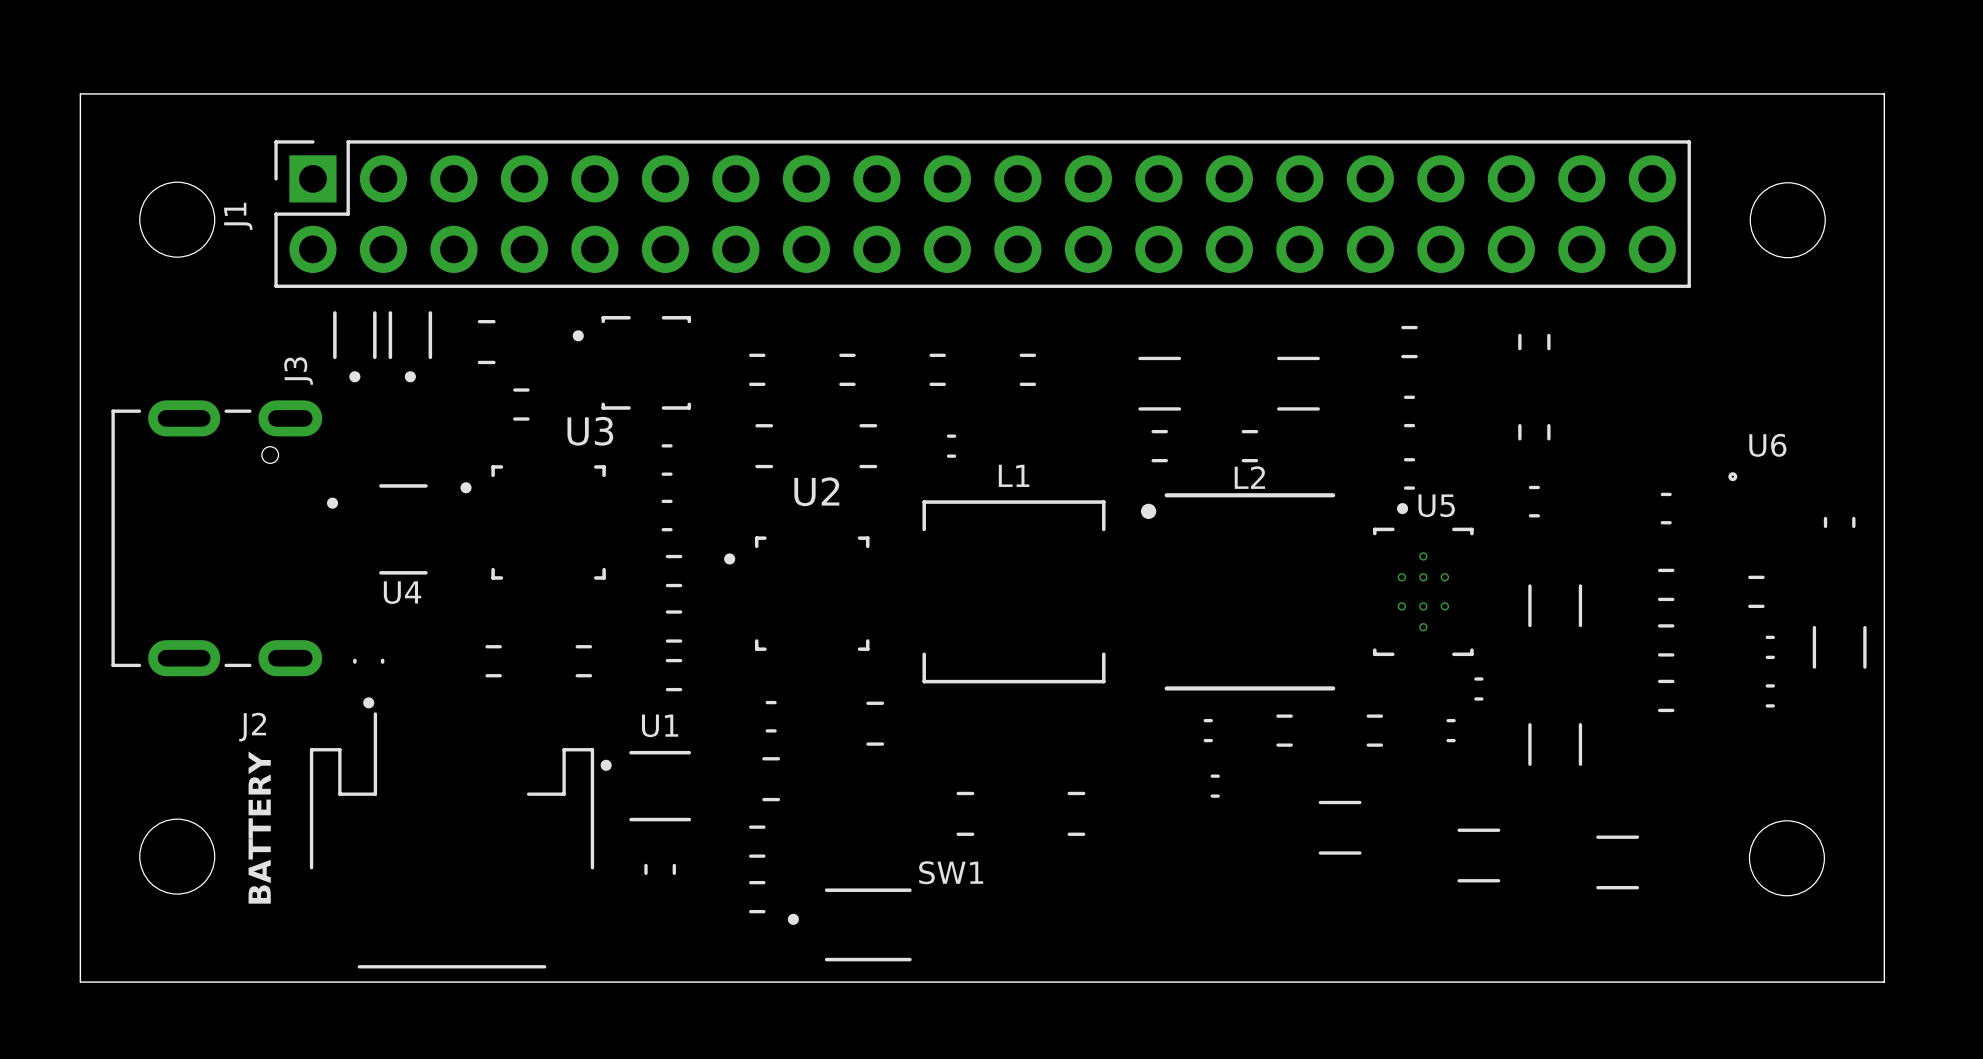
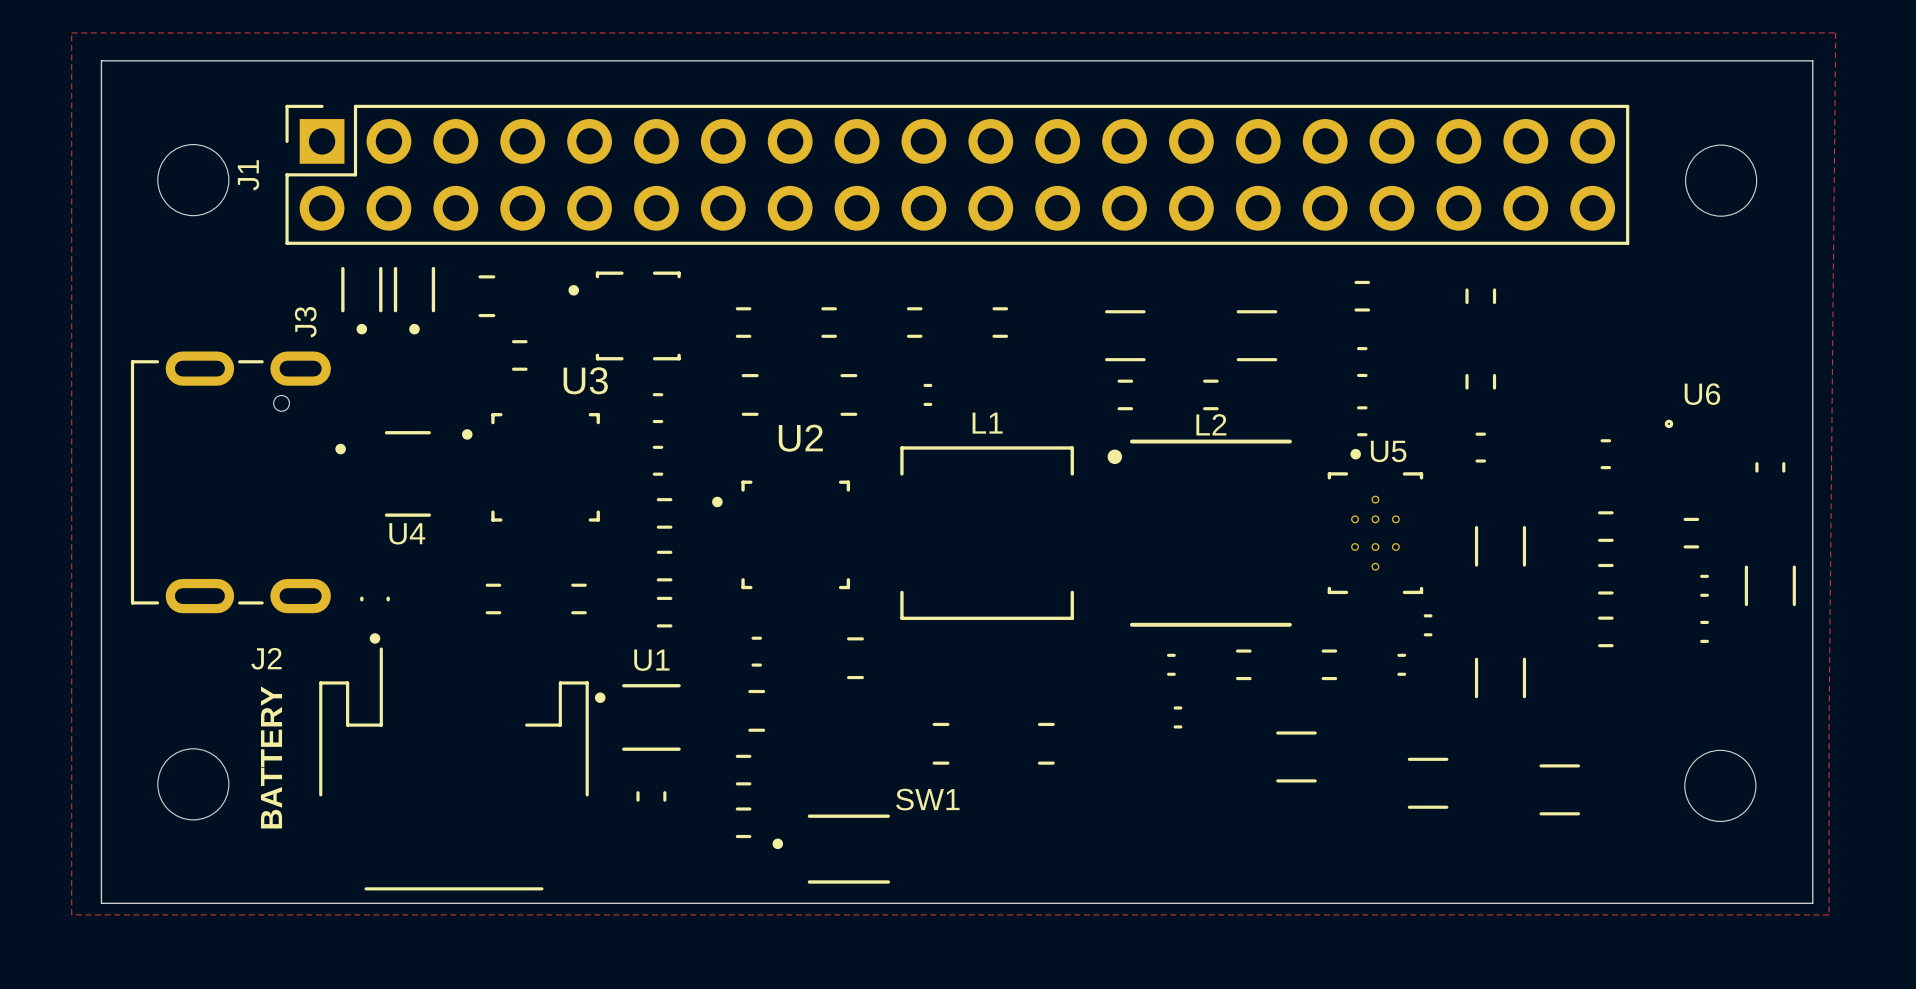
zone outline: none -> (71, 32) (71, 914) (1829, 914) (1835, 32) (71, 32)

